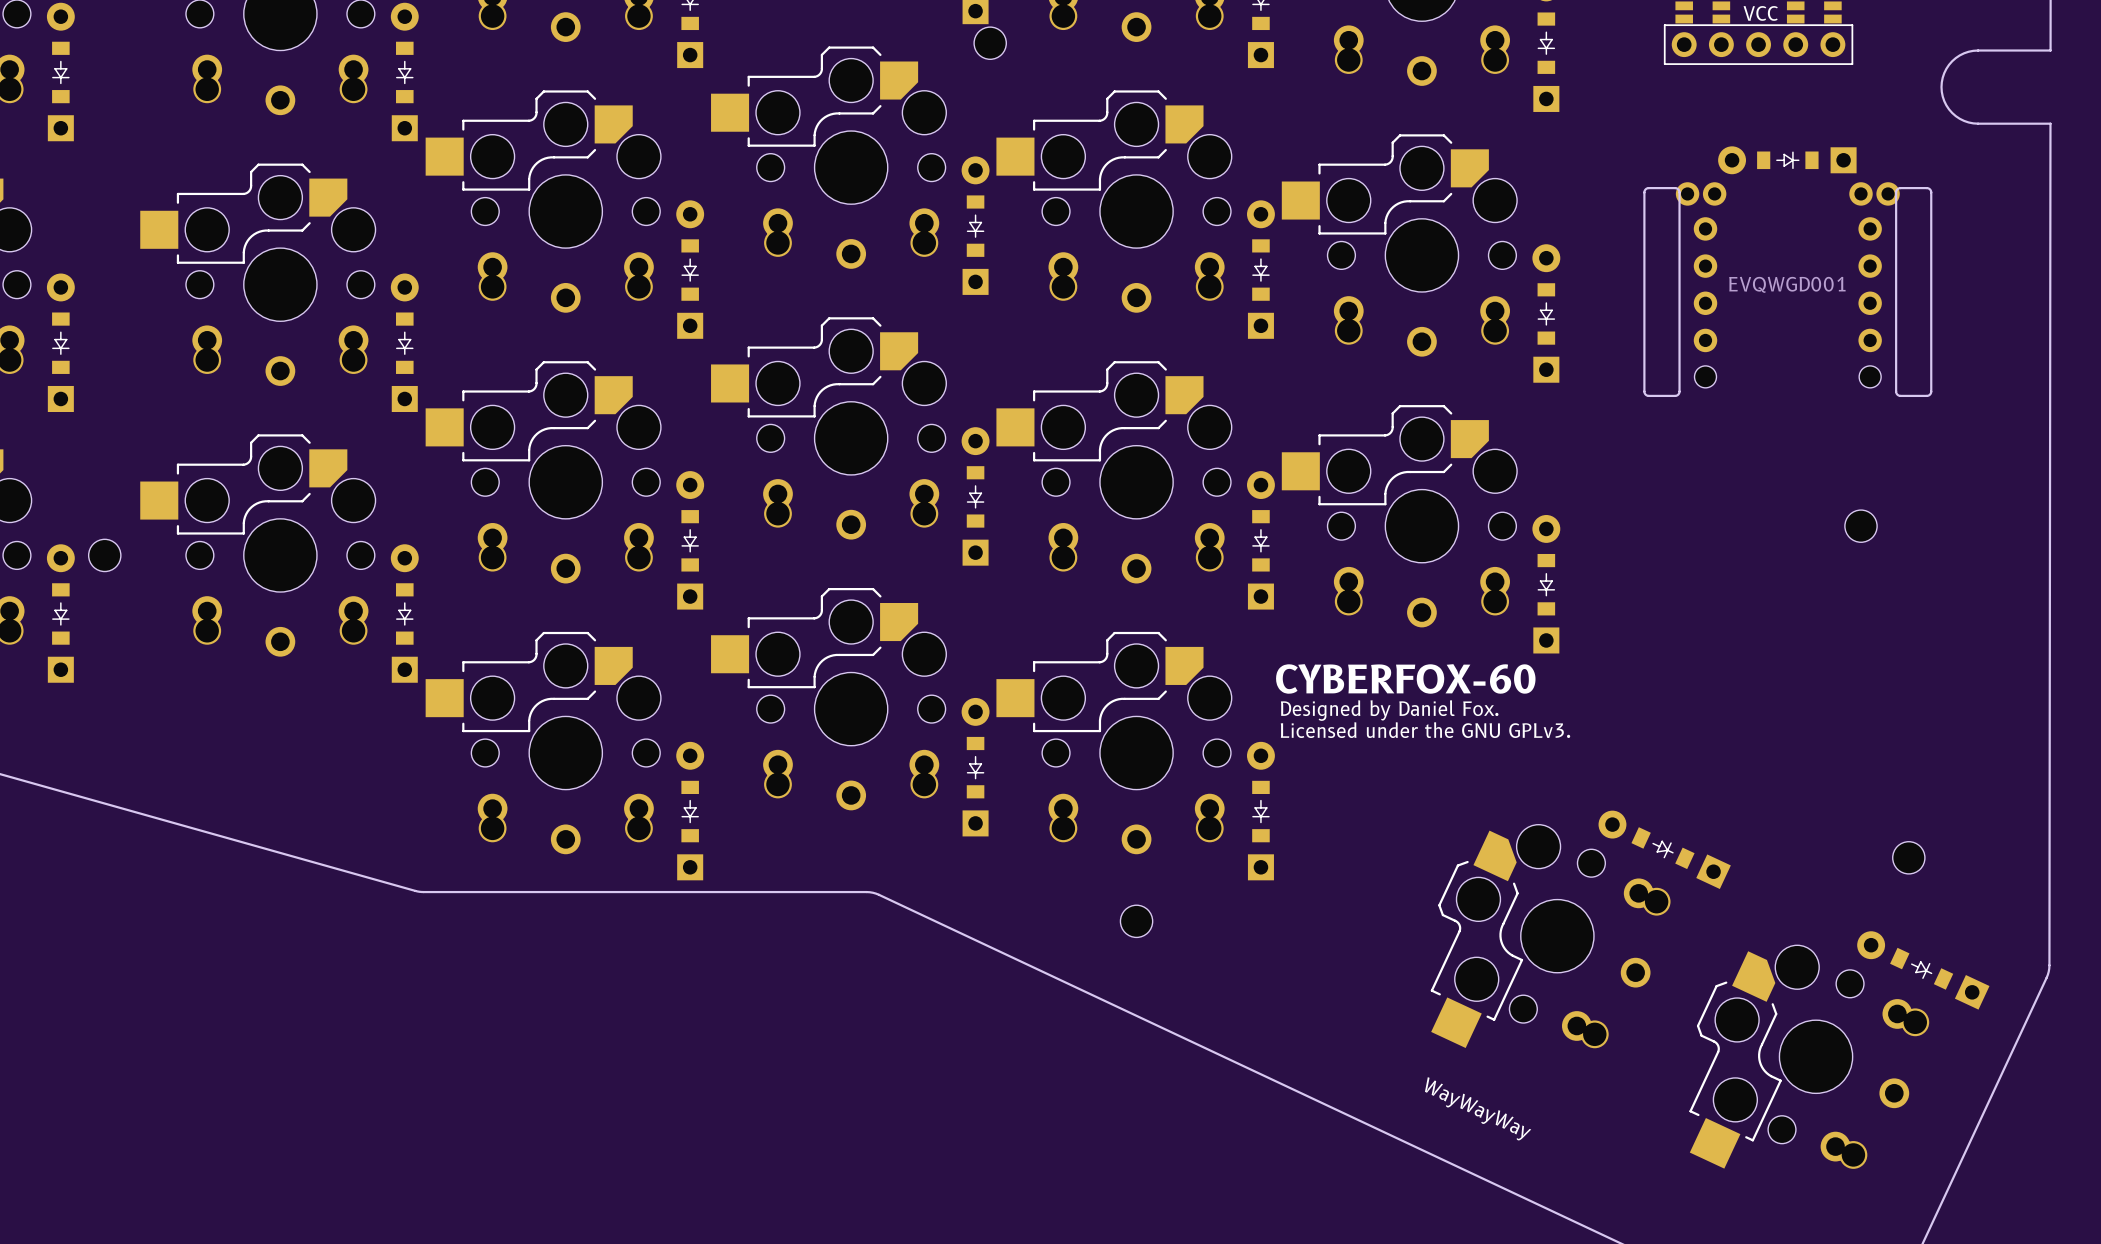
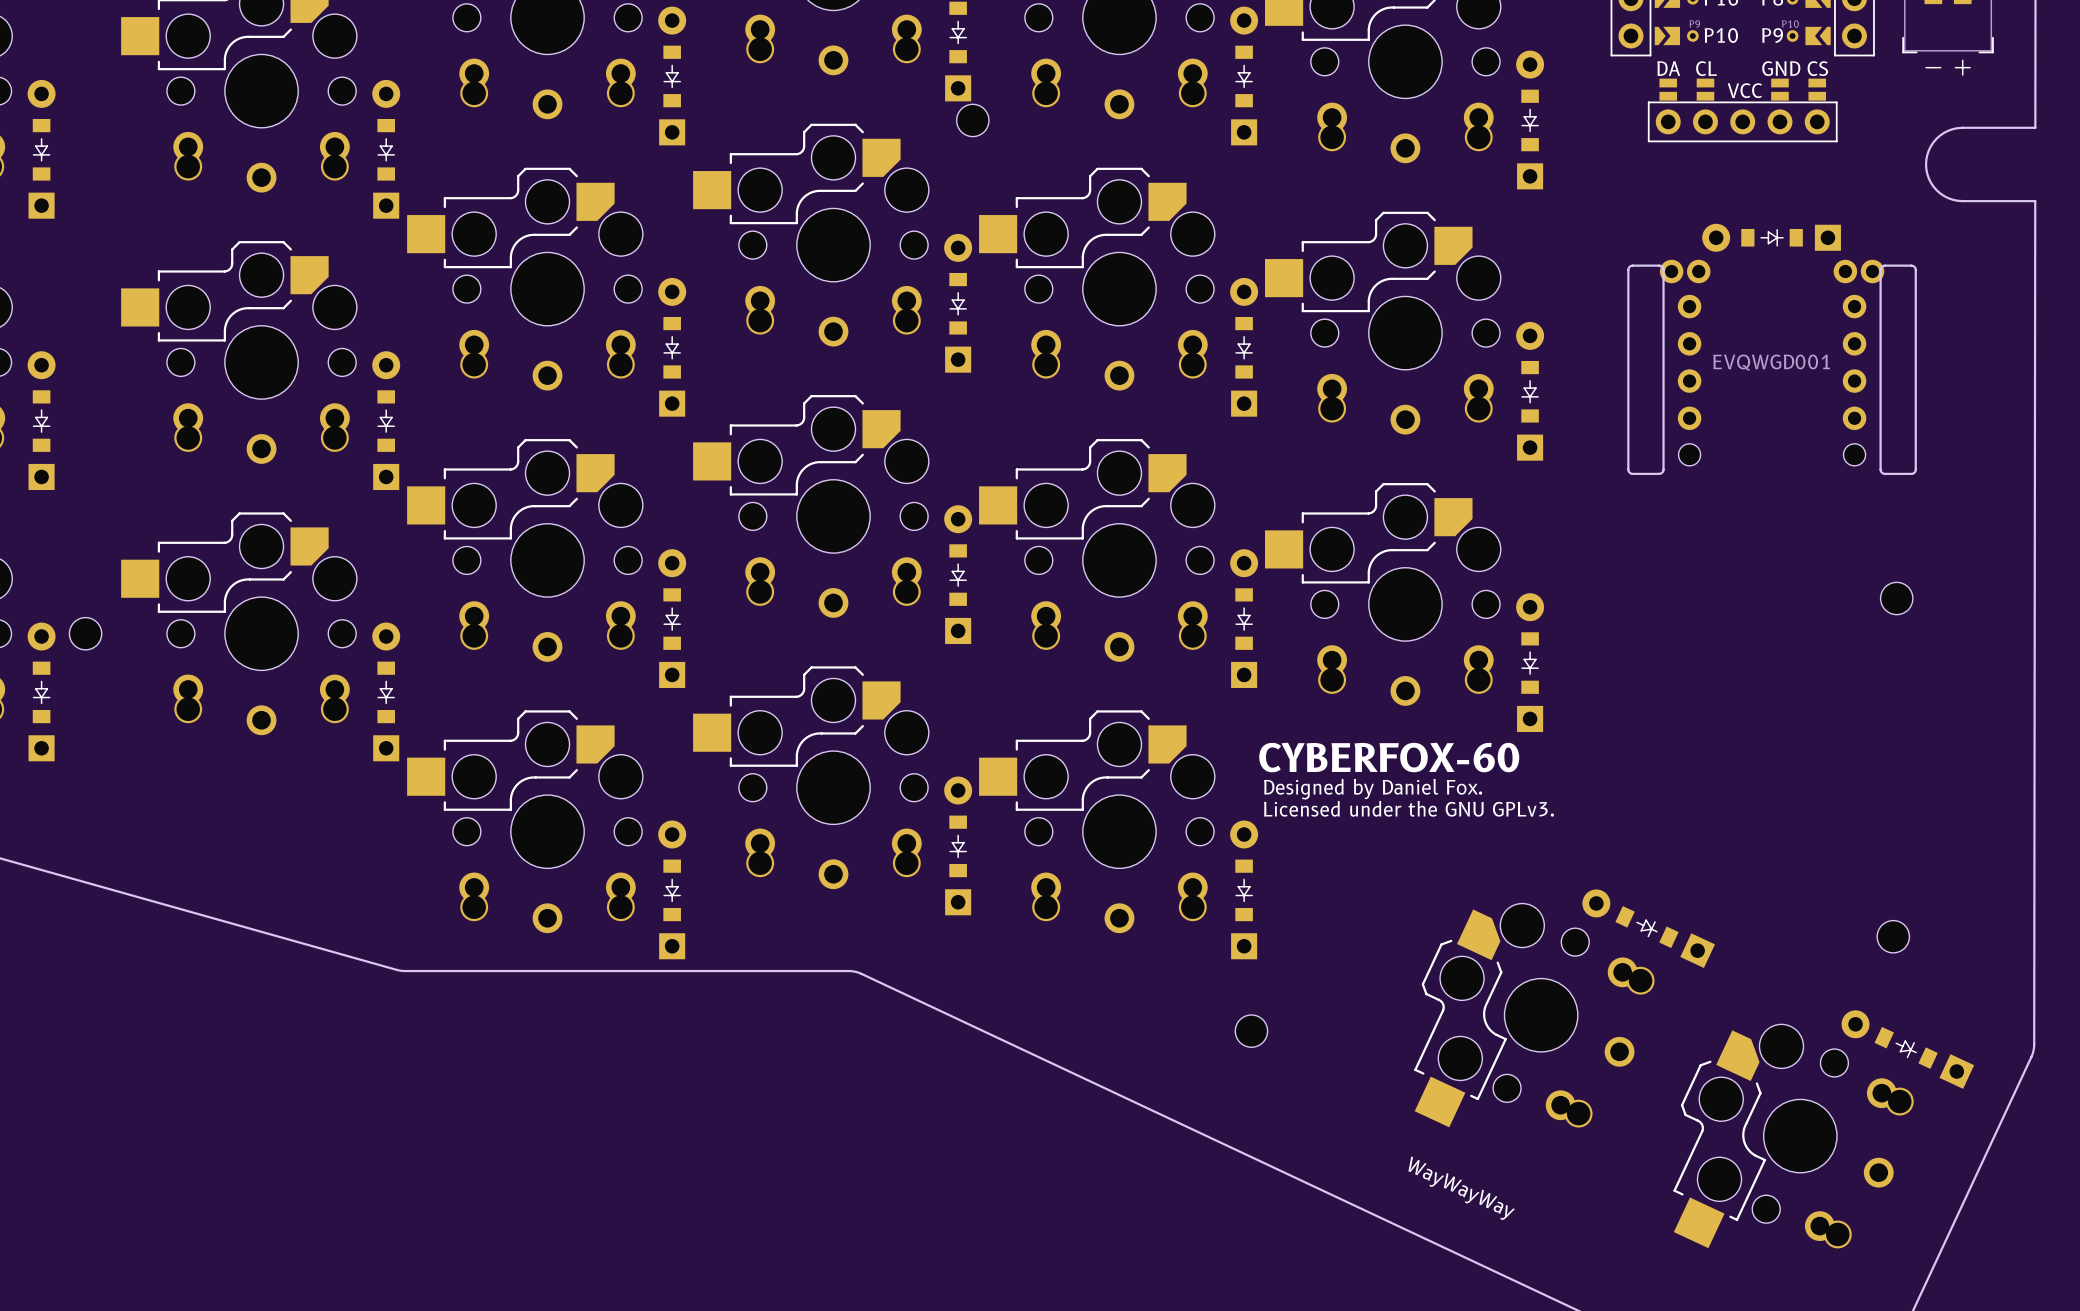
part position: (1861, 526) -> (1896, 598)
part position: (1136, 921) -> (1251, 1031)

